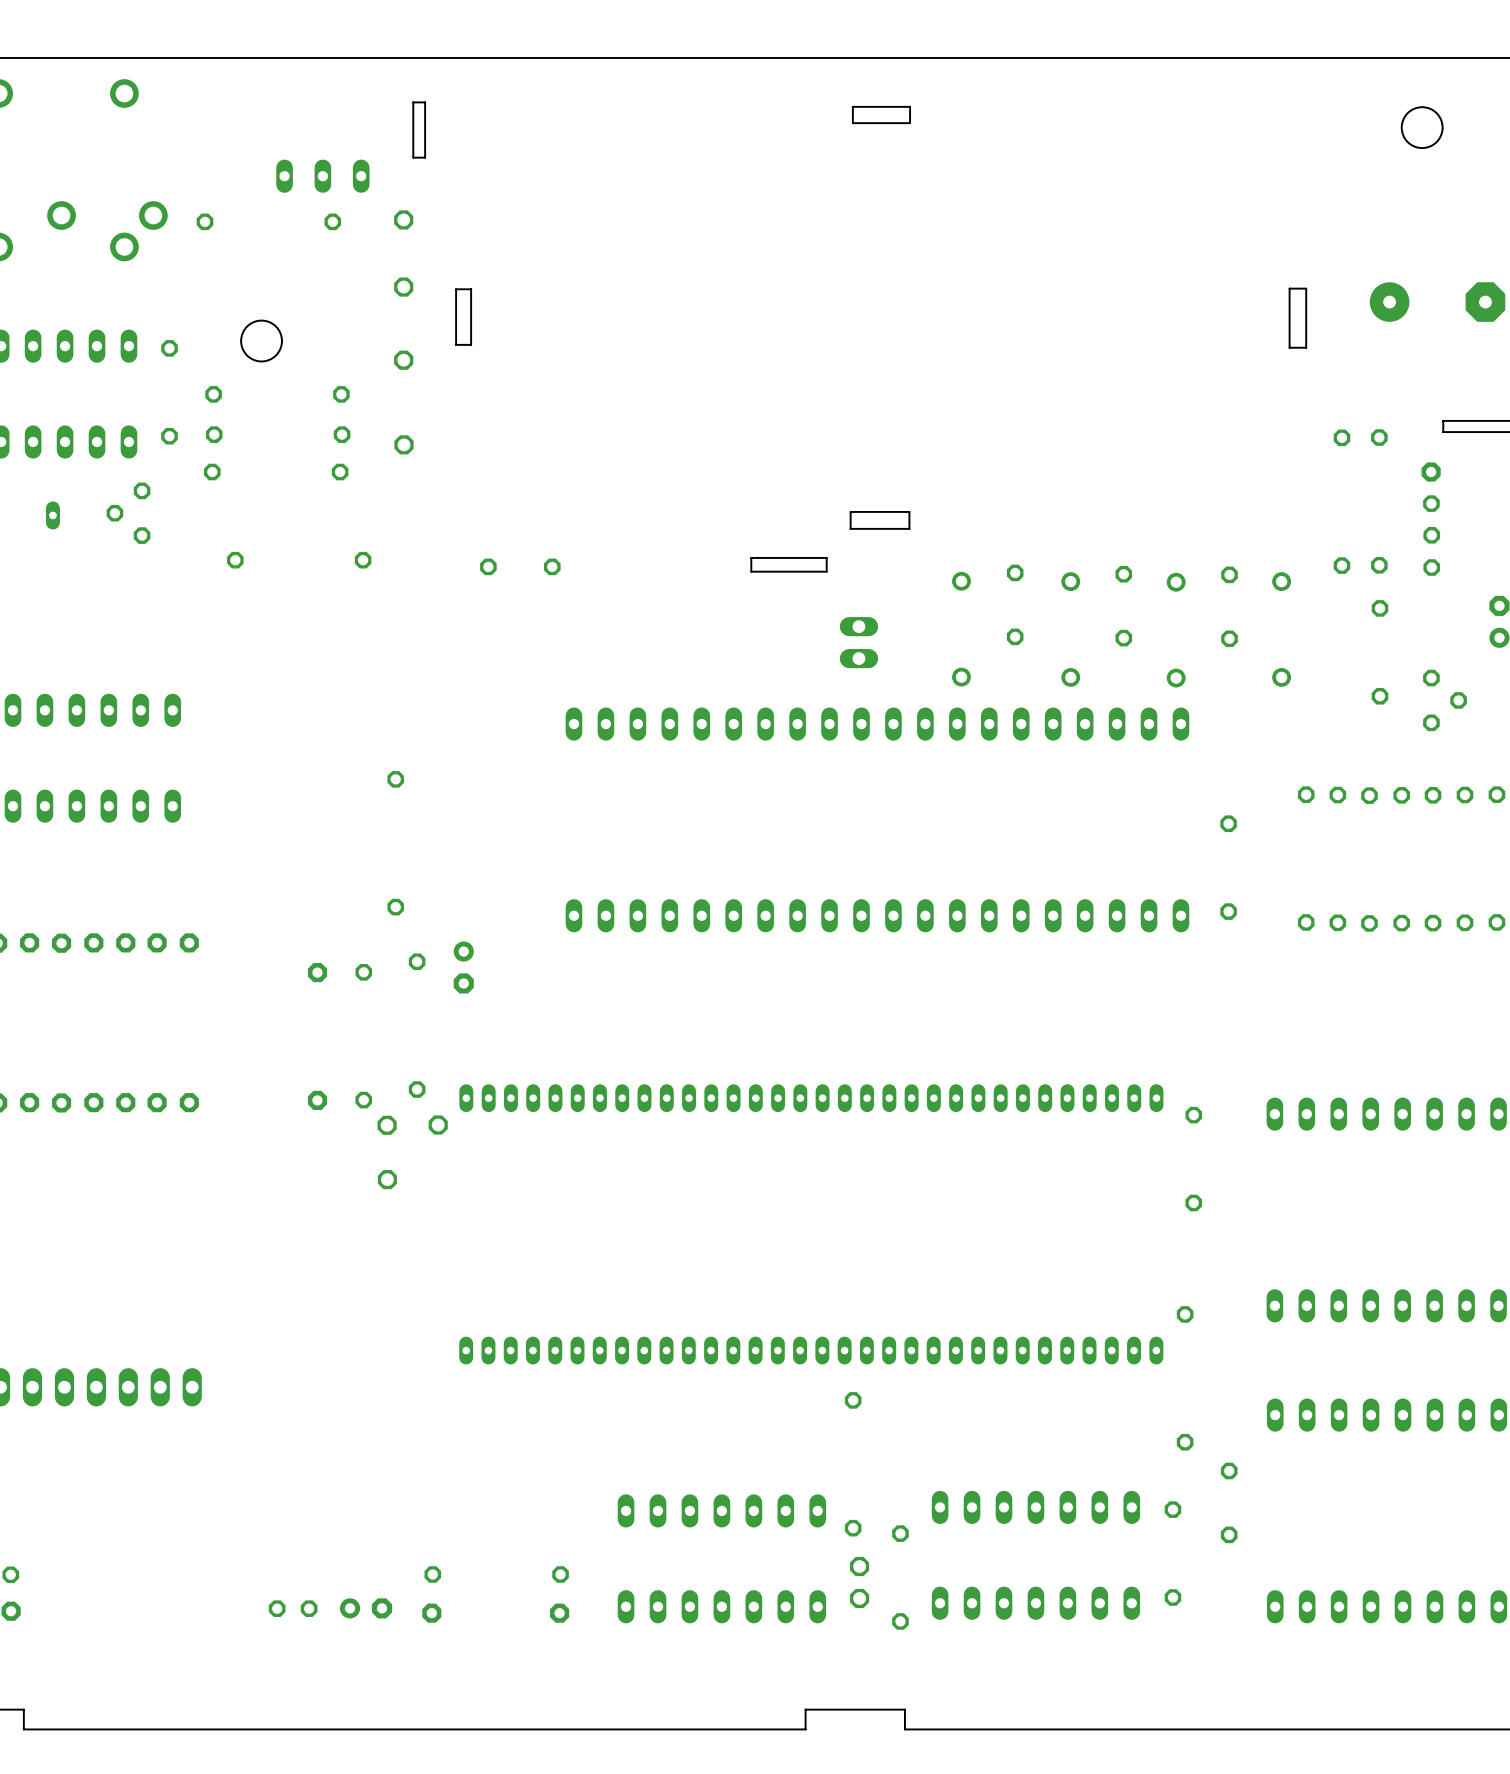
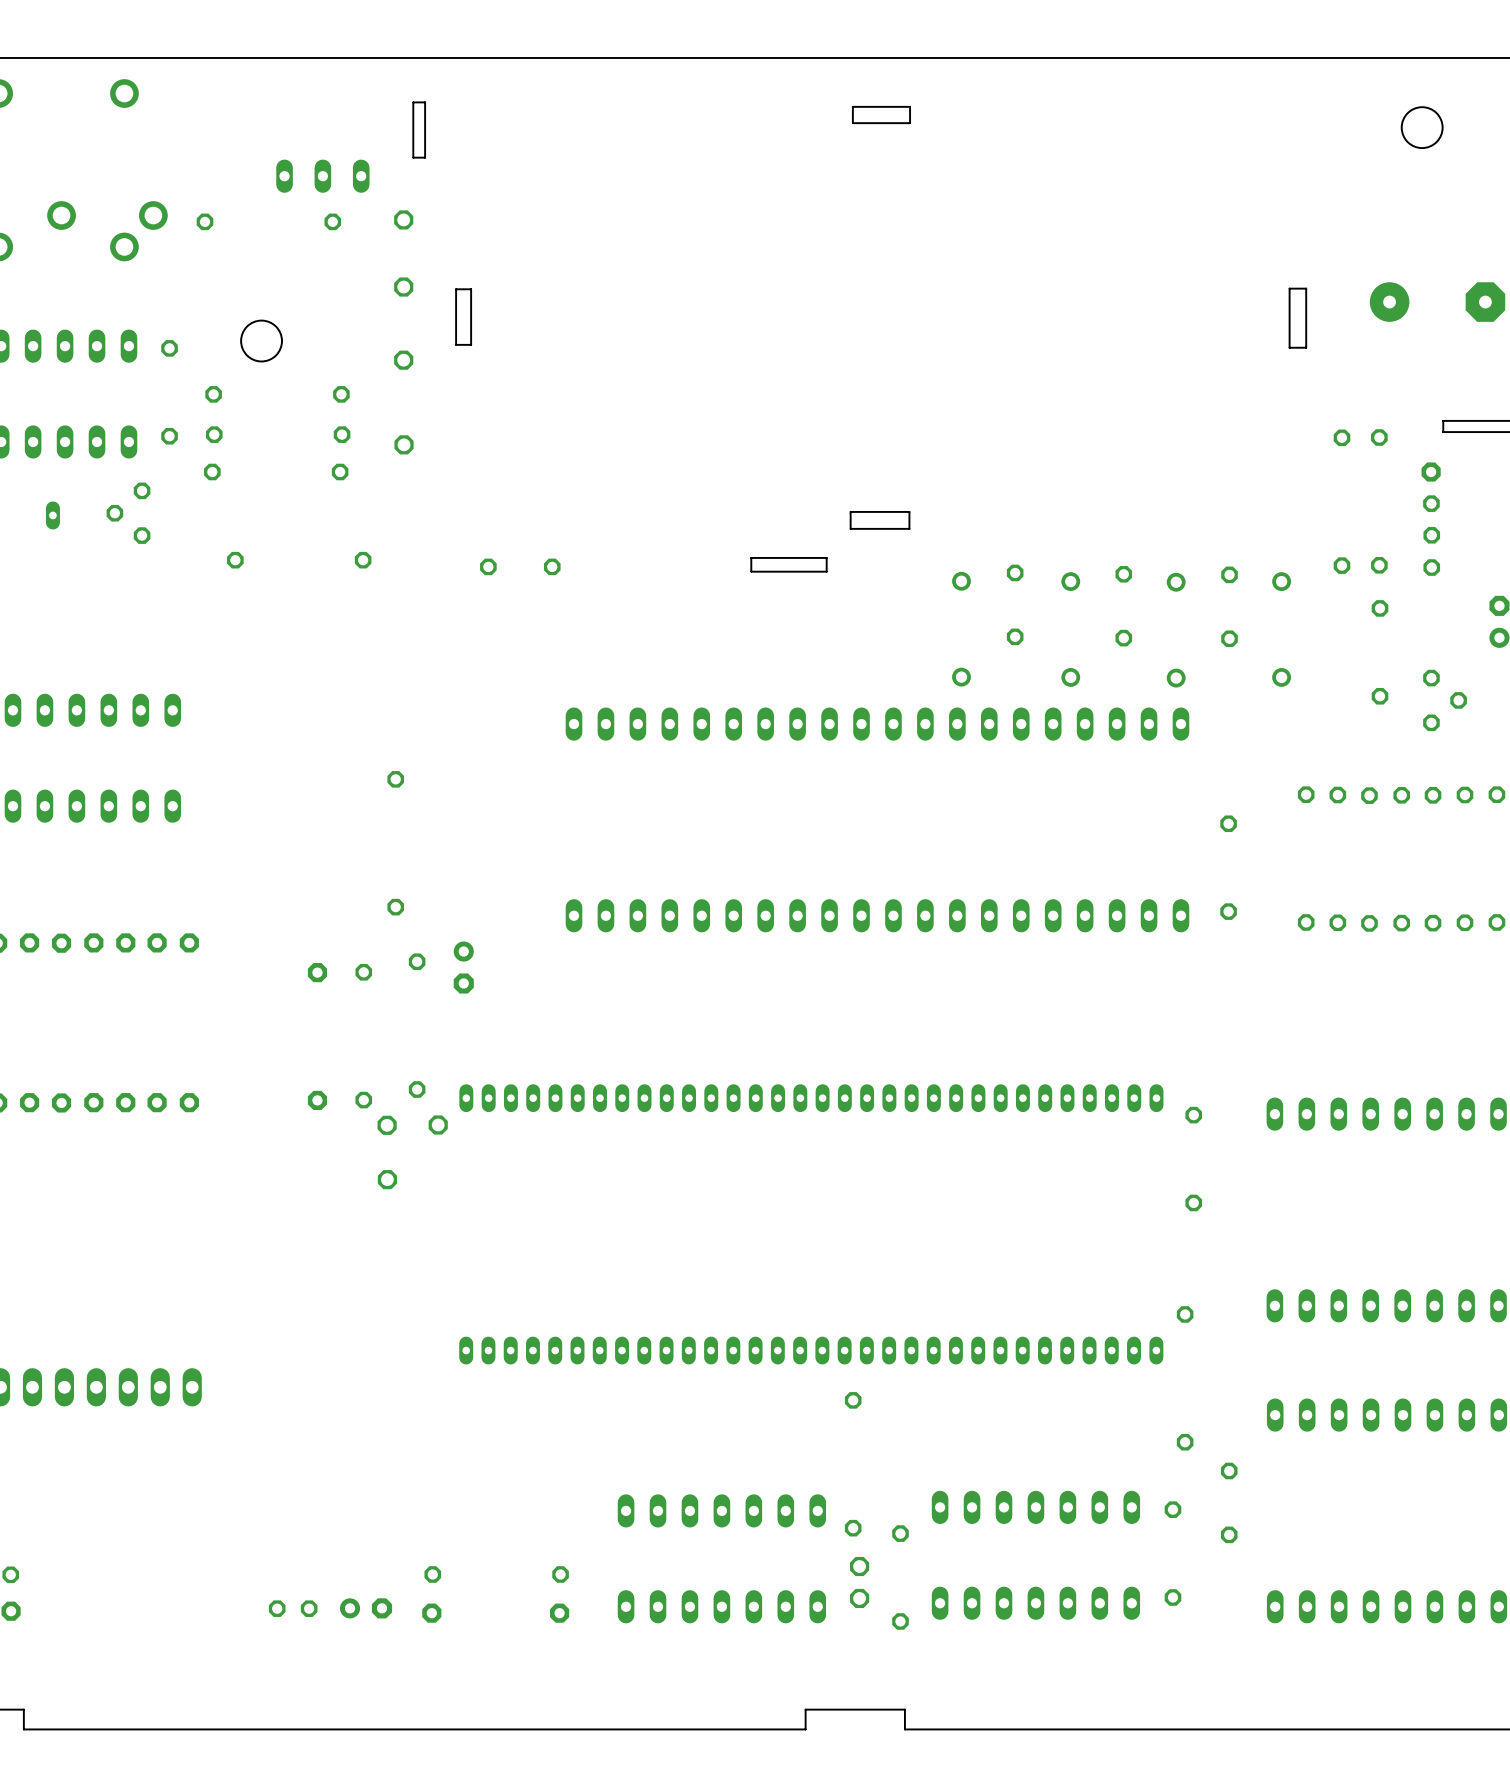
part: (858, 642) -> none

